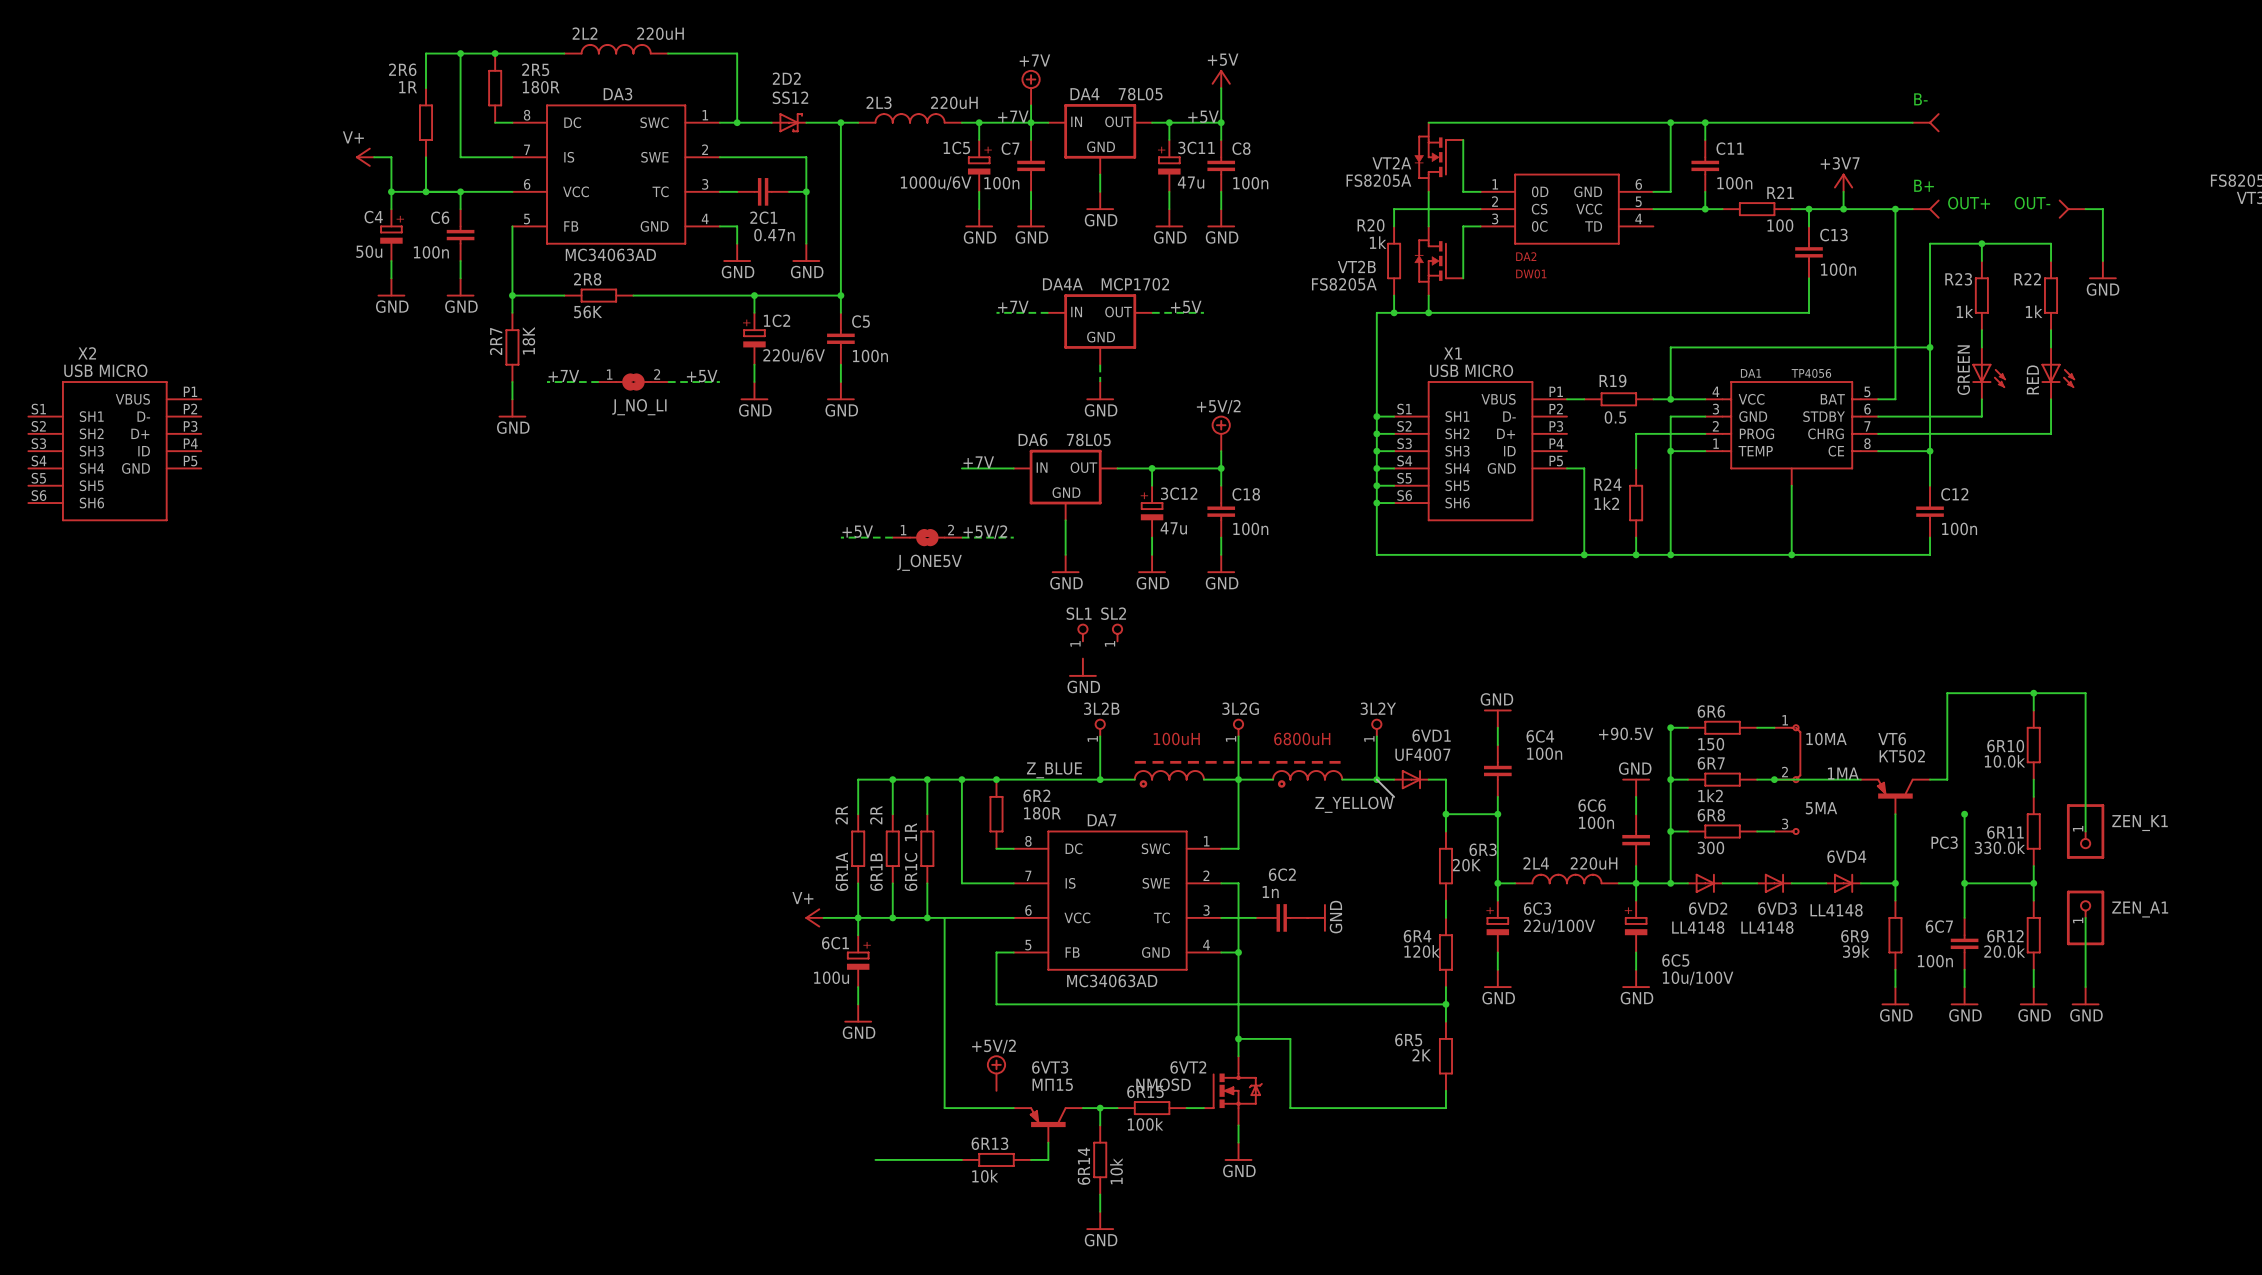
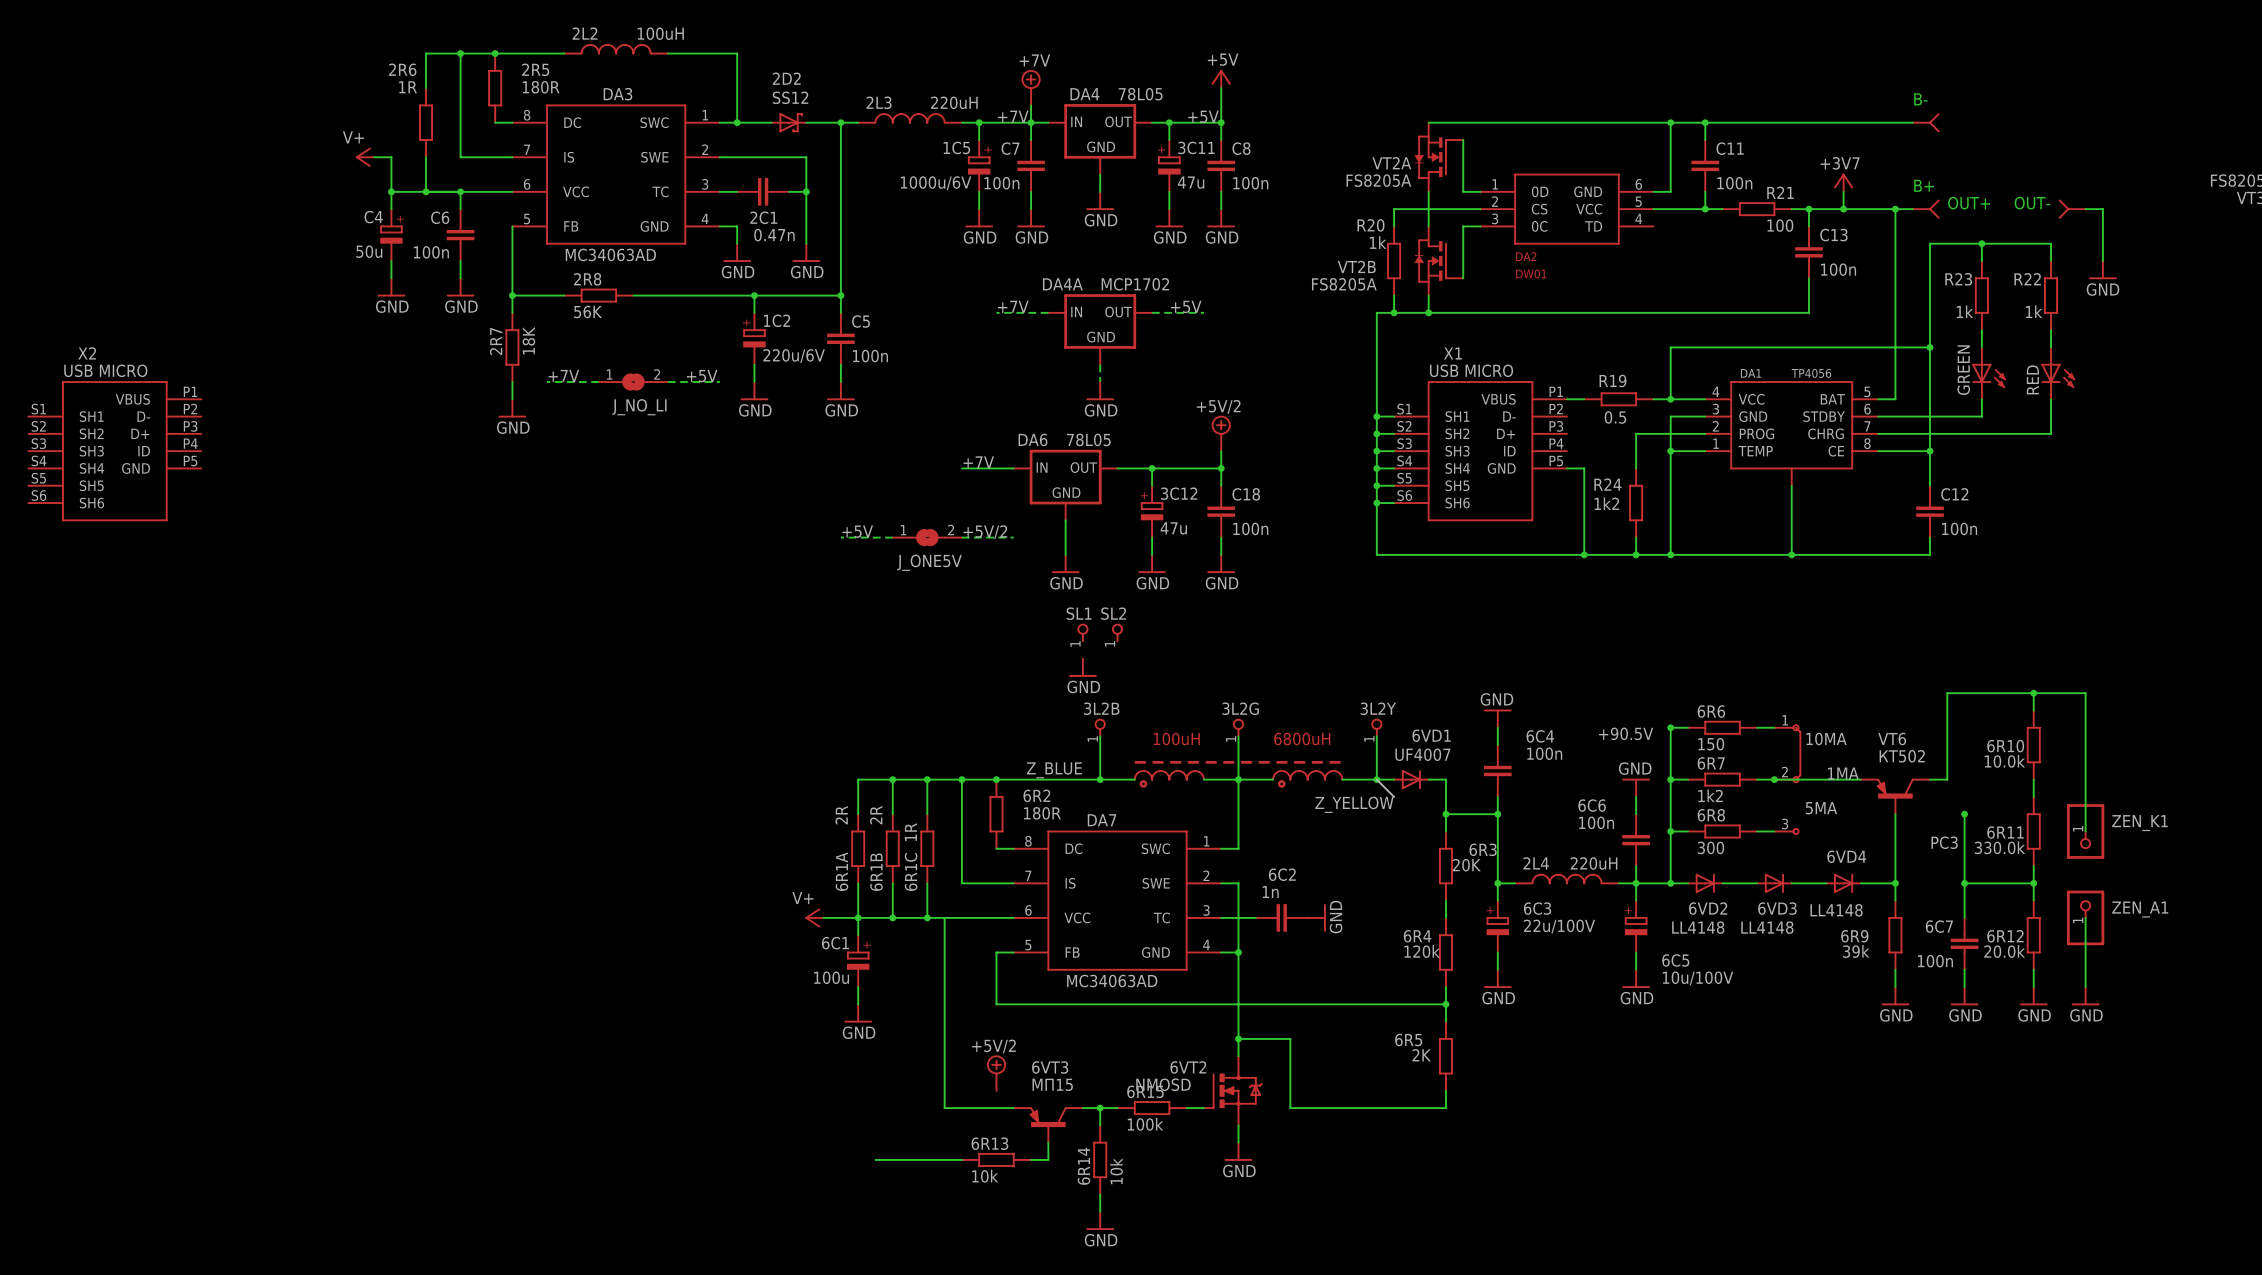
2L2 value: 220uH (660, 33) -> 100uH (660, 33)

